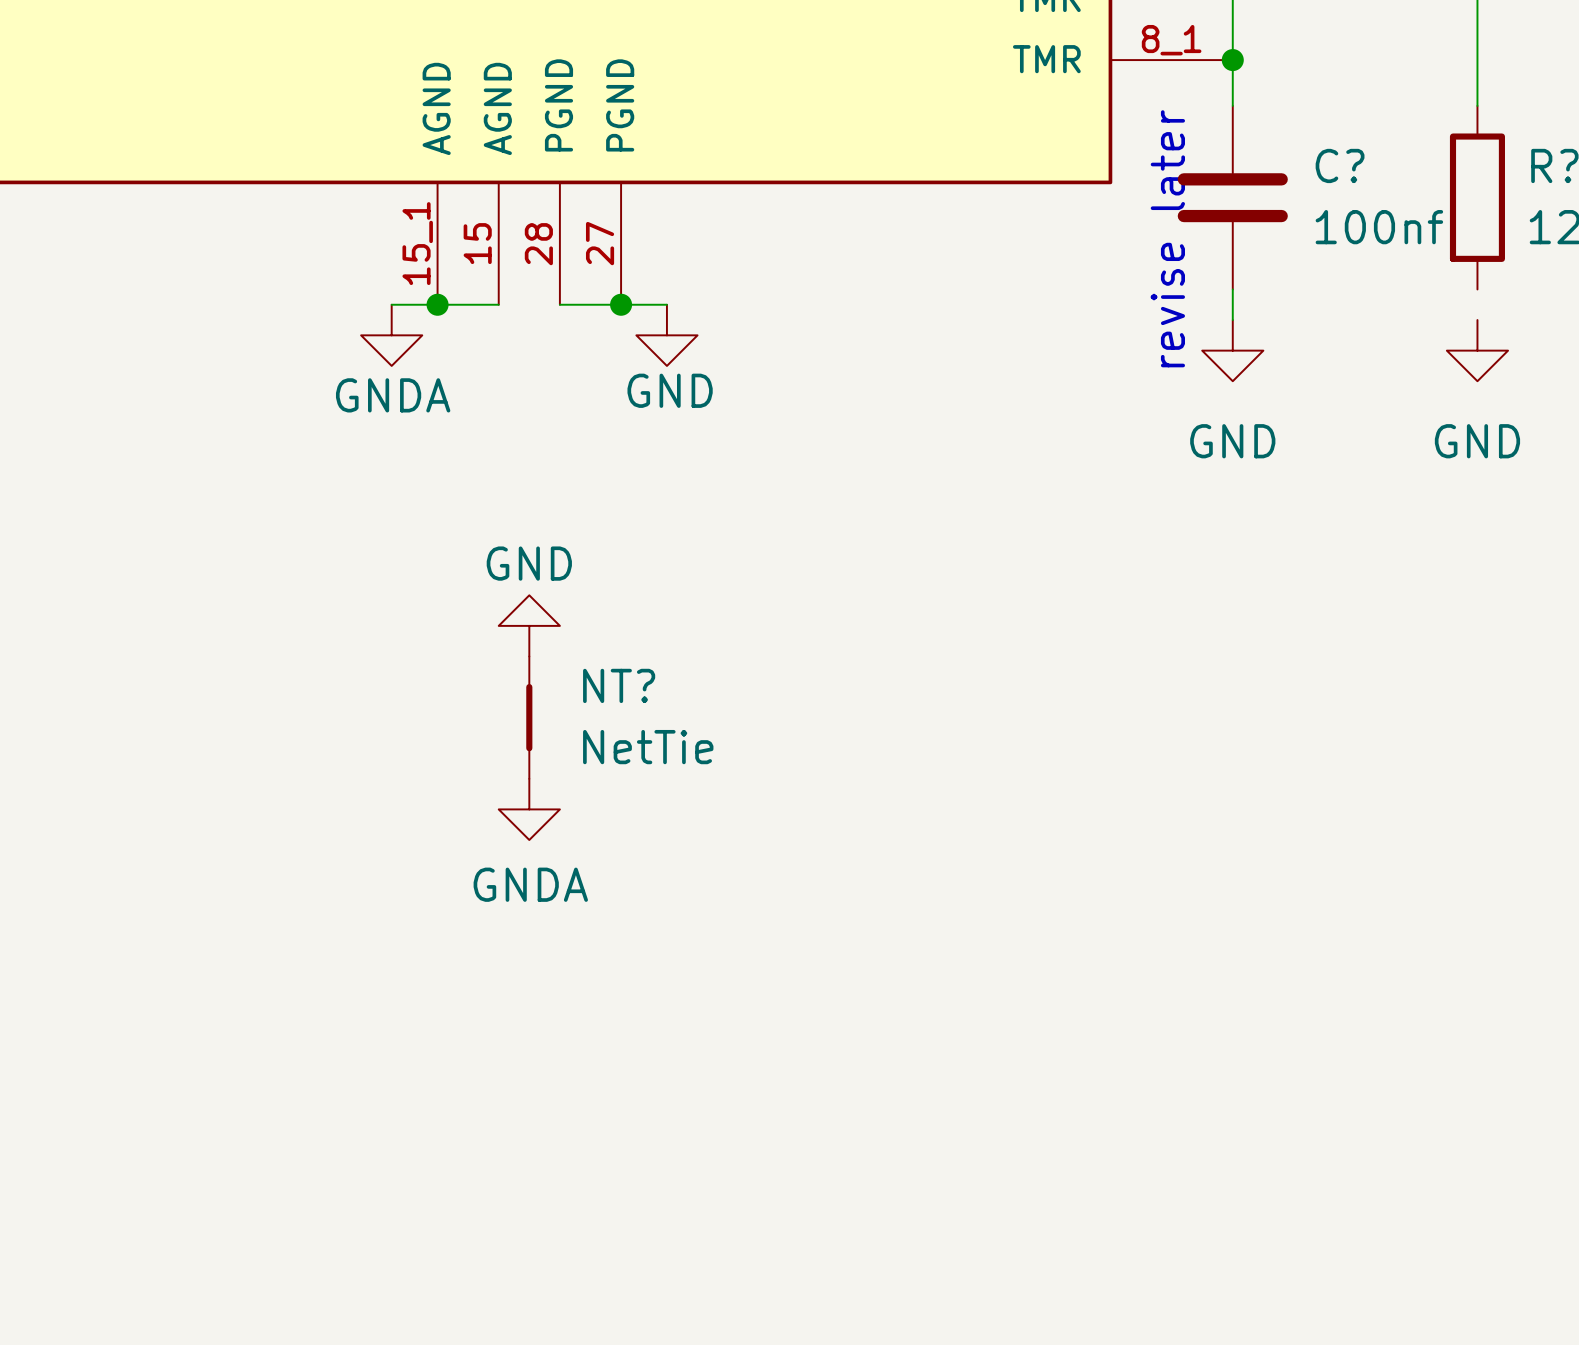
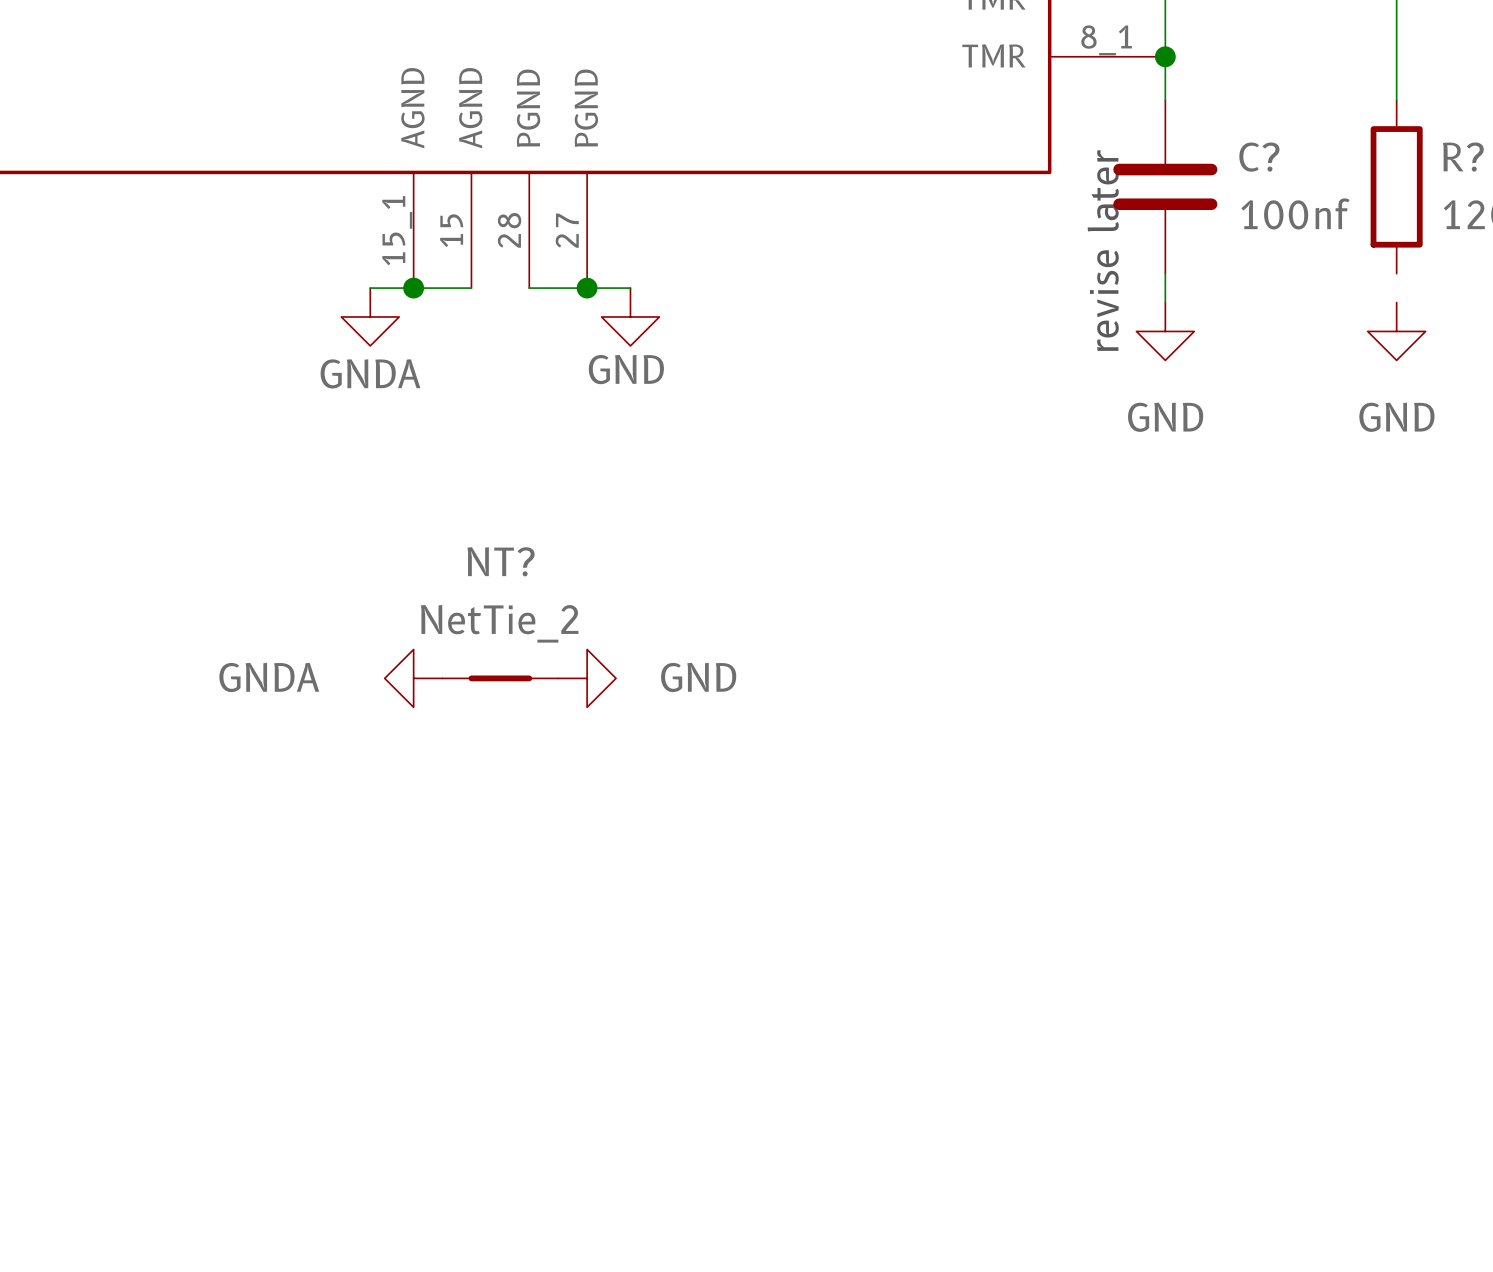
power symbol text position: GND (529, 563) -> GND (698, 677)
power symbol rotation: 0° (529, 625) -> 90° clockwise (587, 678)
power symbol position: GND (529, 625) -> GND (587, 678)
NT? name position: NT? (619, 685) -> NT? (501, 561)
NT? rotation: 0° (529, 717) -> 90° clockwise (500, 678)
NT? value: NetTie (648, 747) -> NetTie_2 (499, 623)
power symbol rotation: 0° (529, 809) -> 90° clockwise (413, 678)
power symbol position: GNDA (529, 809) -> GNDA (413, 678)
power symbol text position: GNDA (530, 884) -> GNDA (269, 677)

